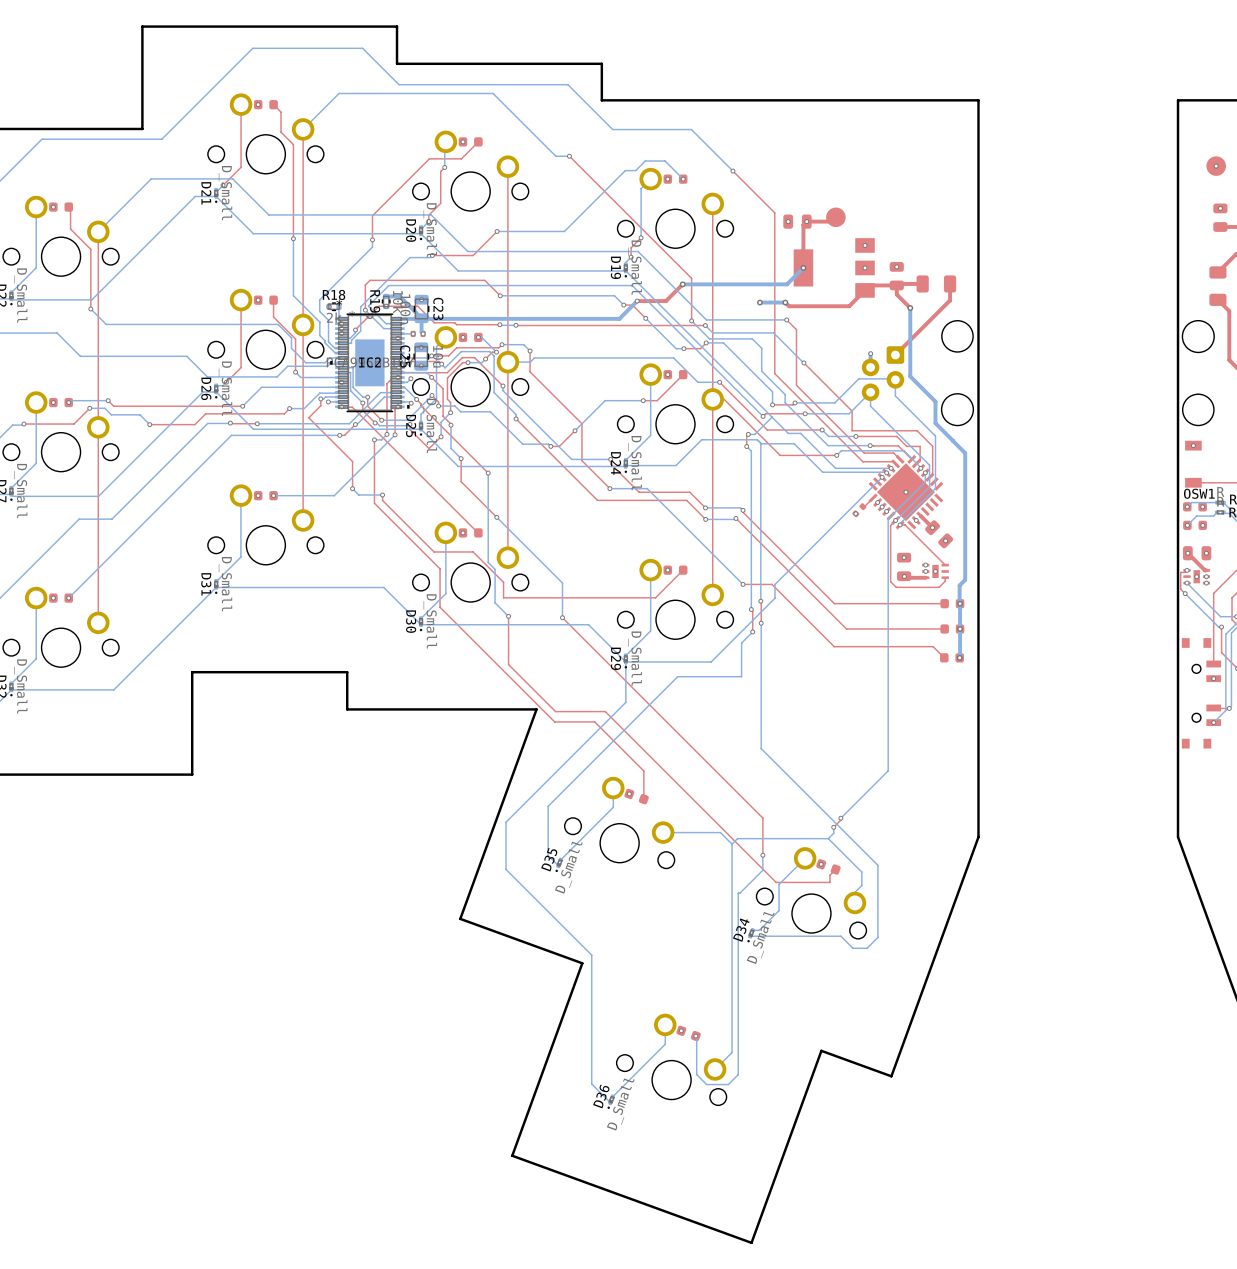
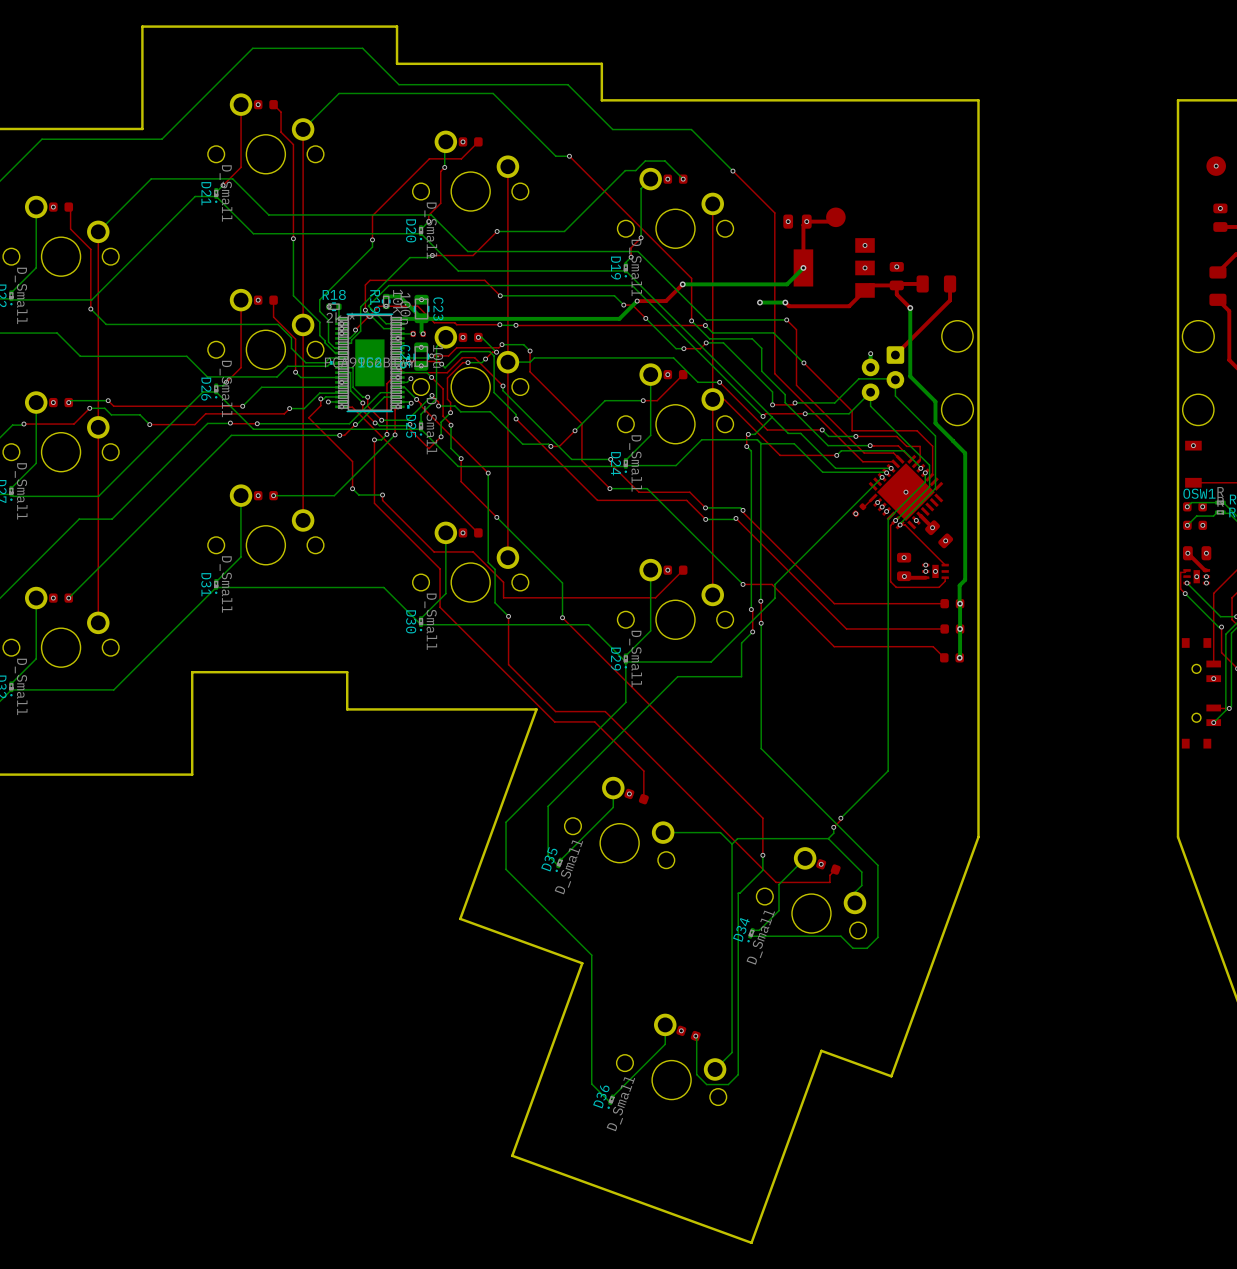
IC2 text: * (339, 302) -> none
via: (1187, 570) -> none

